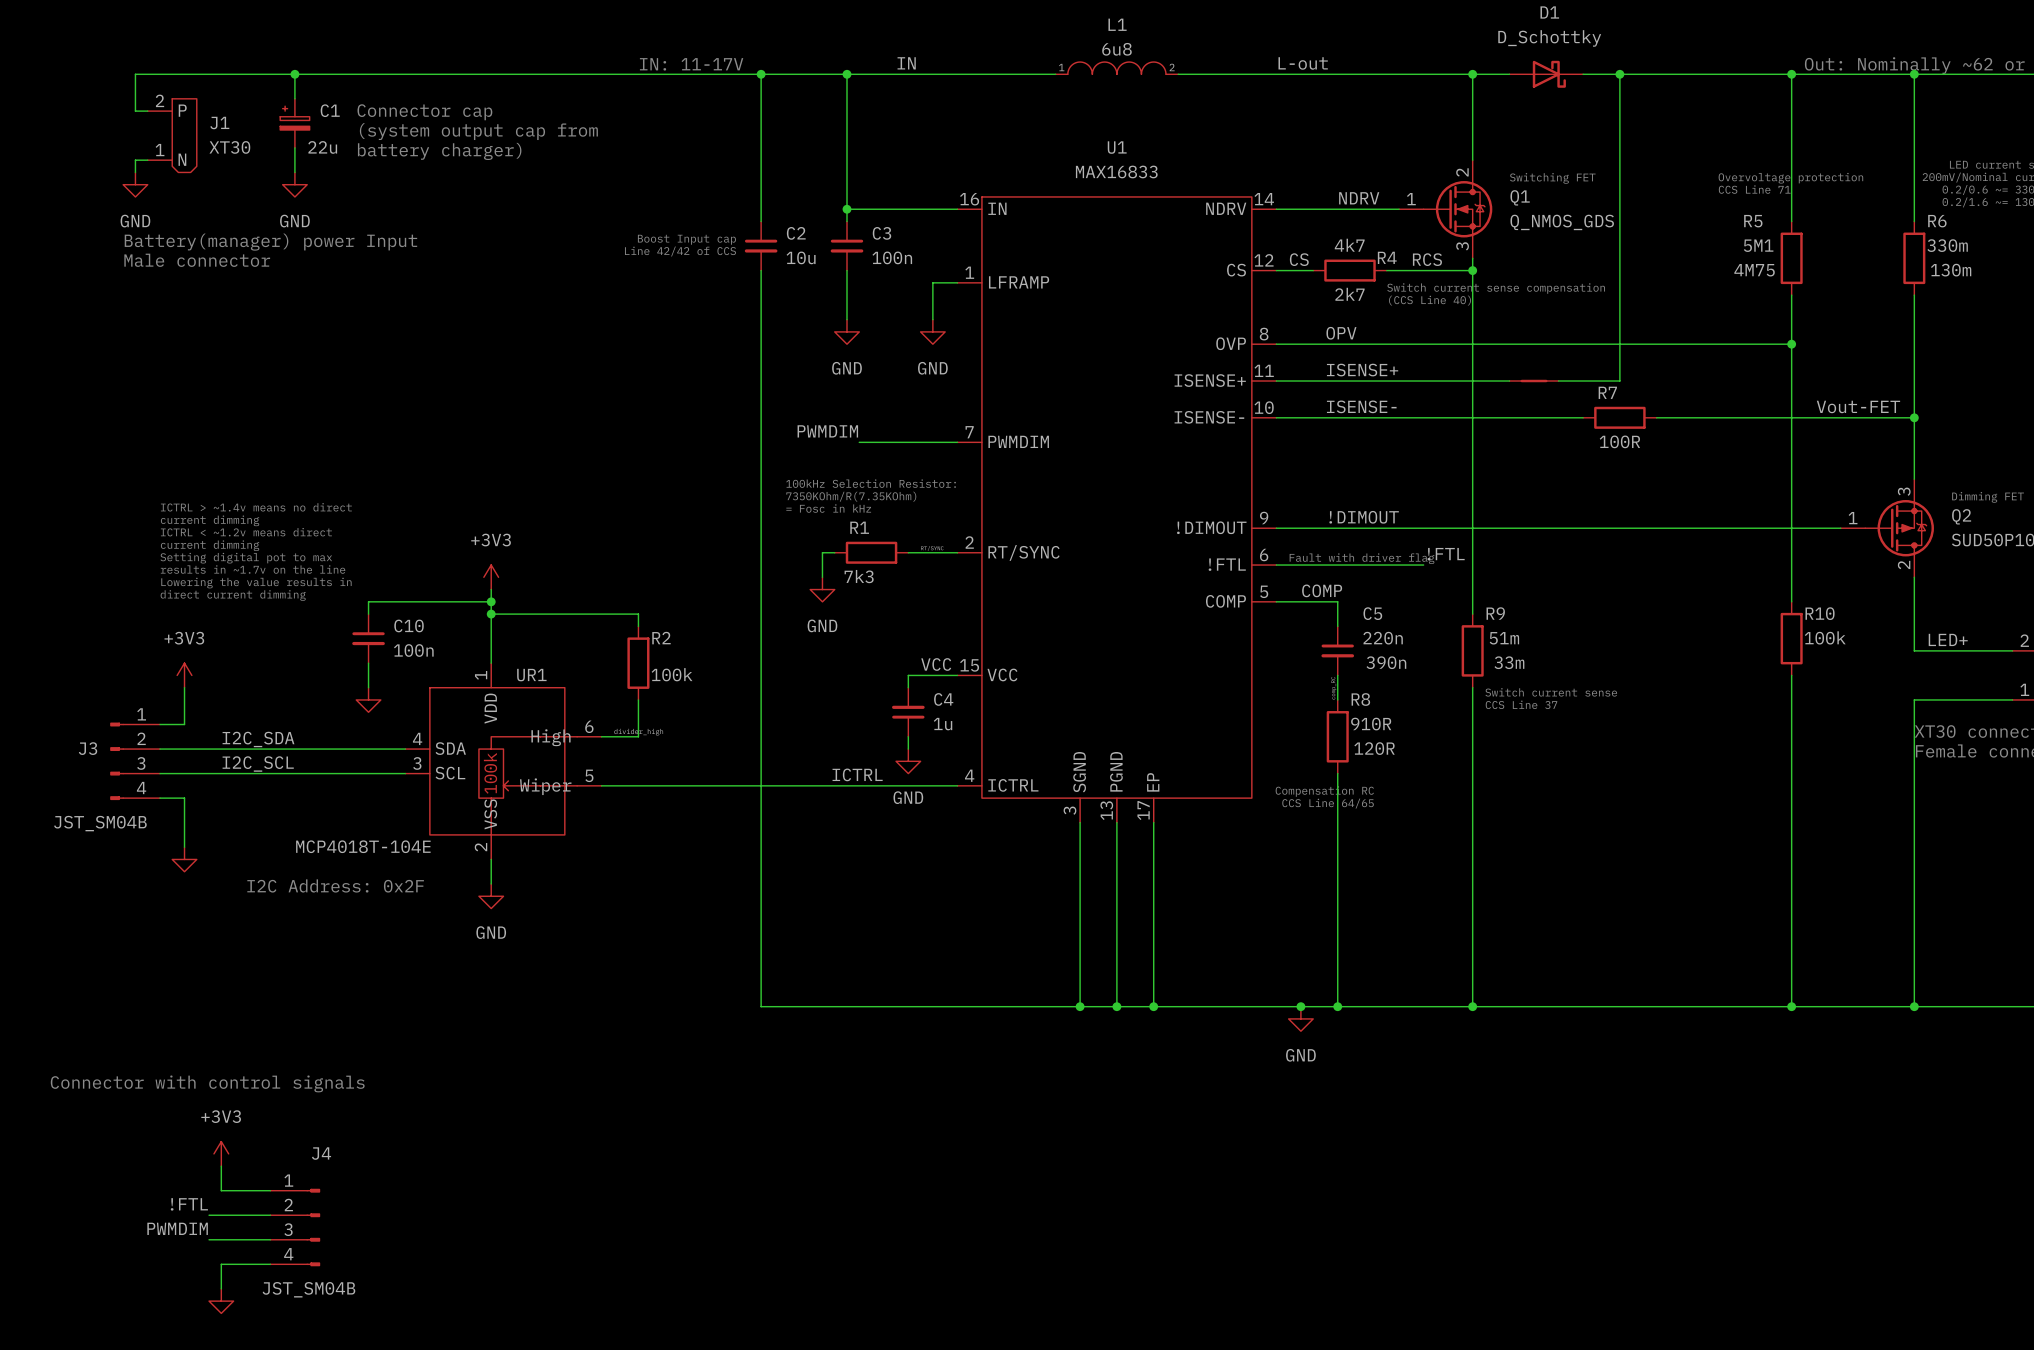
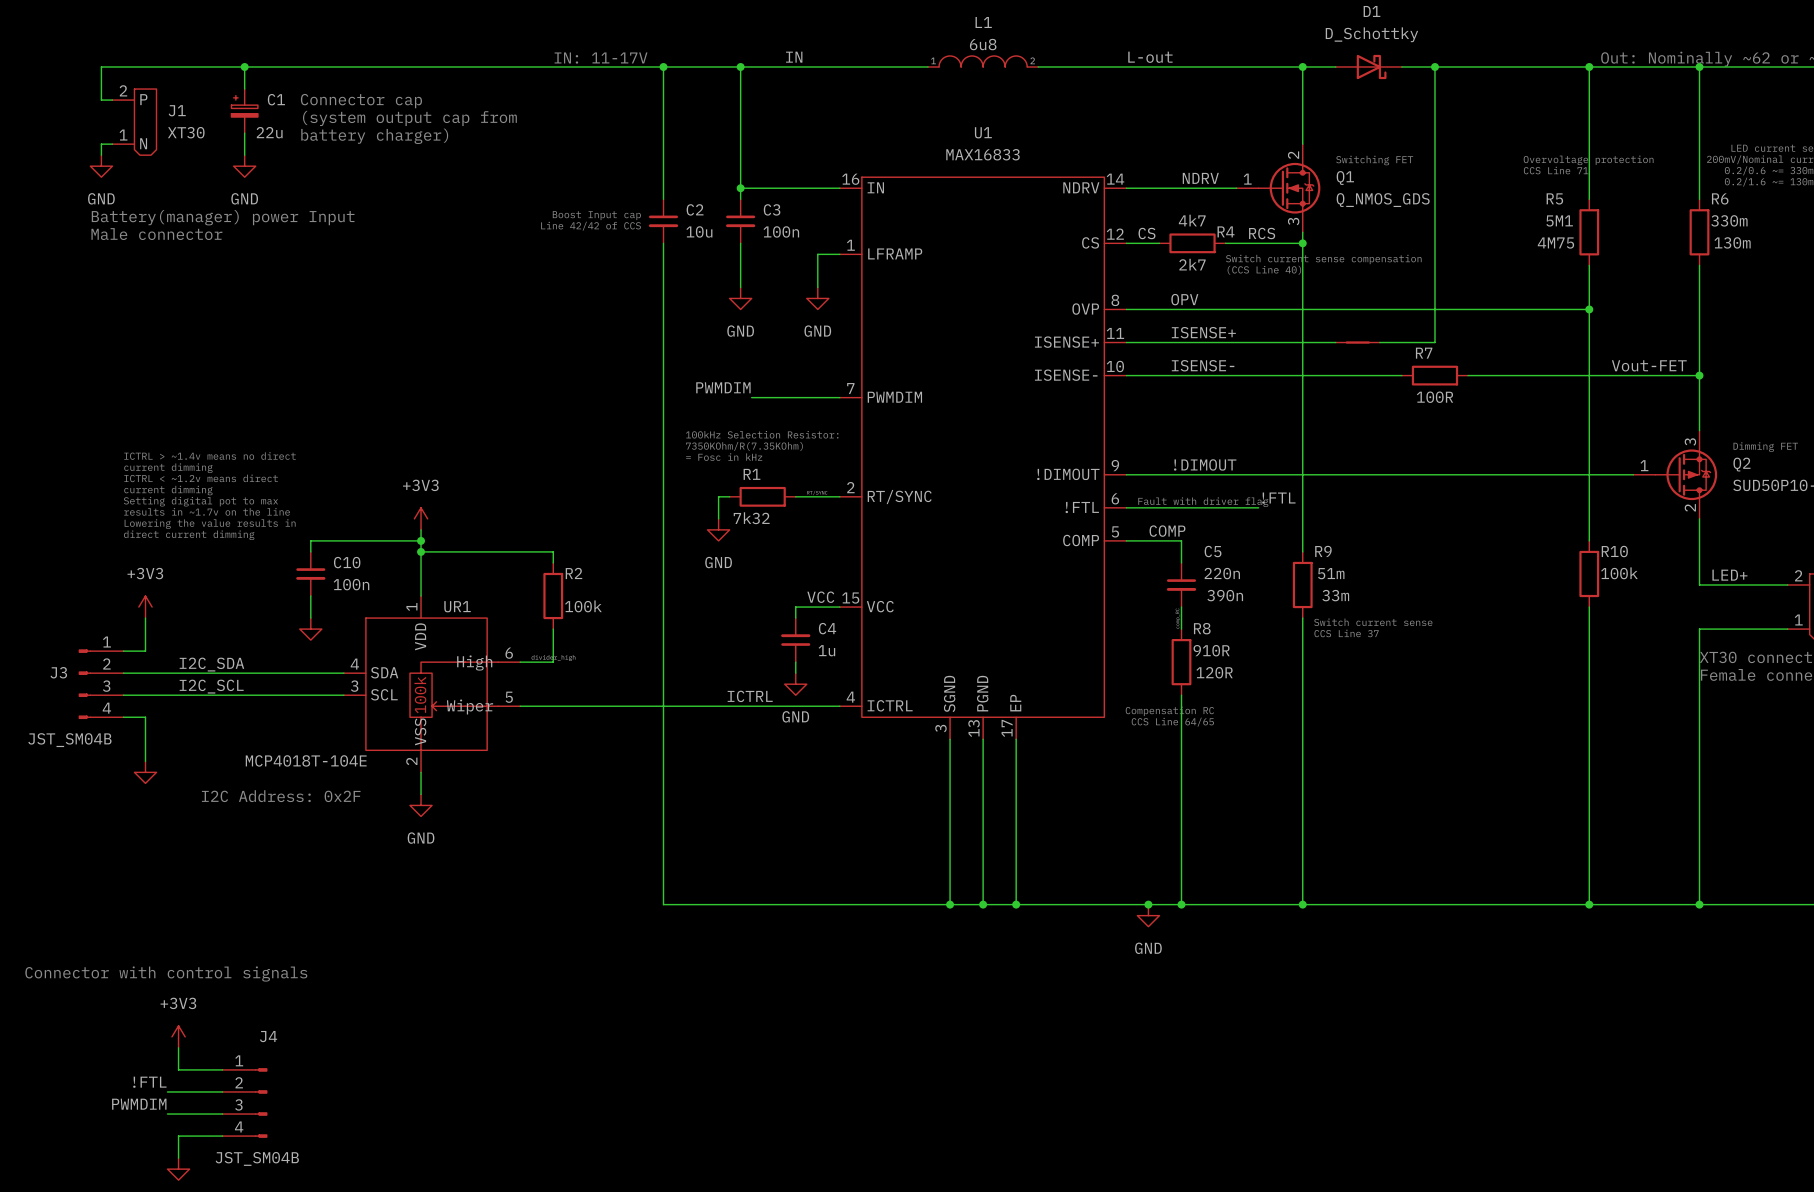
R1 value: 7k3 (859, 576) -> 7k32 (751, 518)

